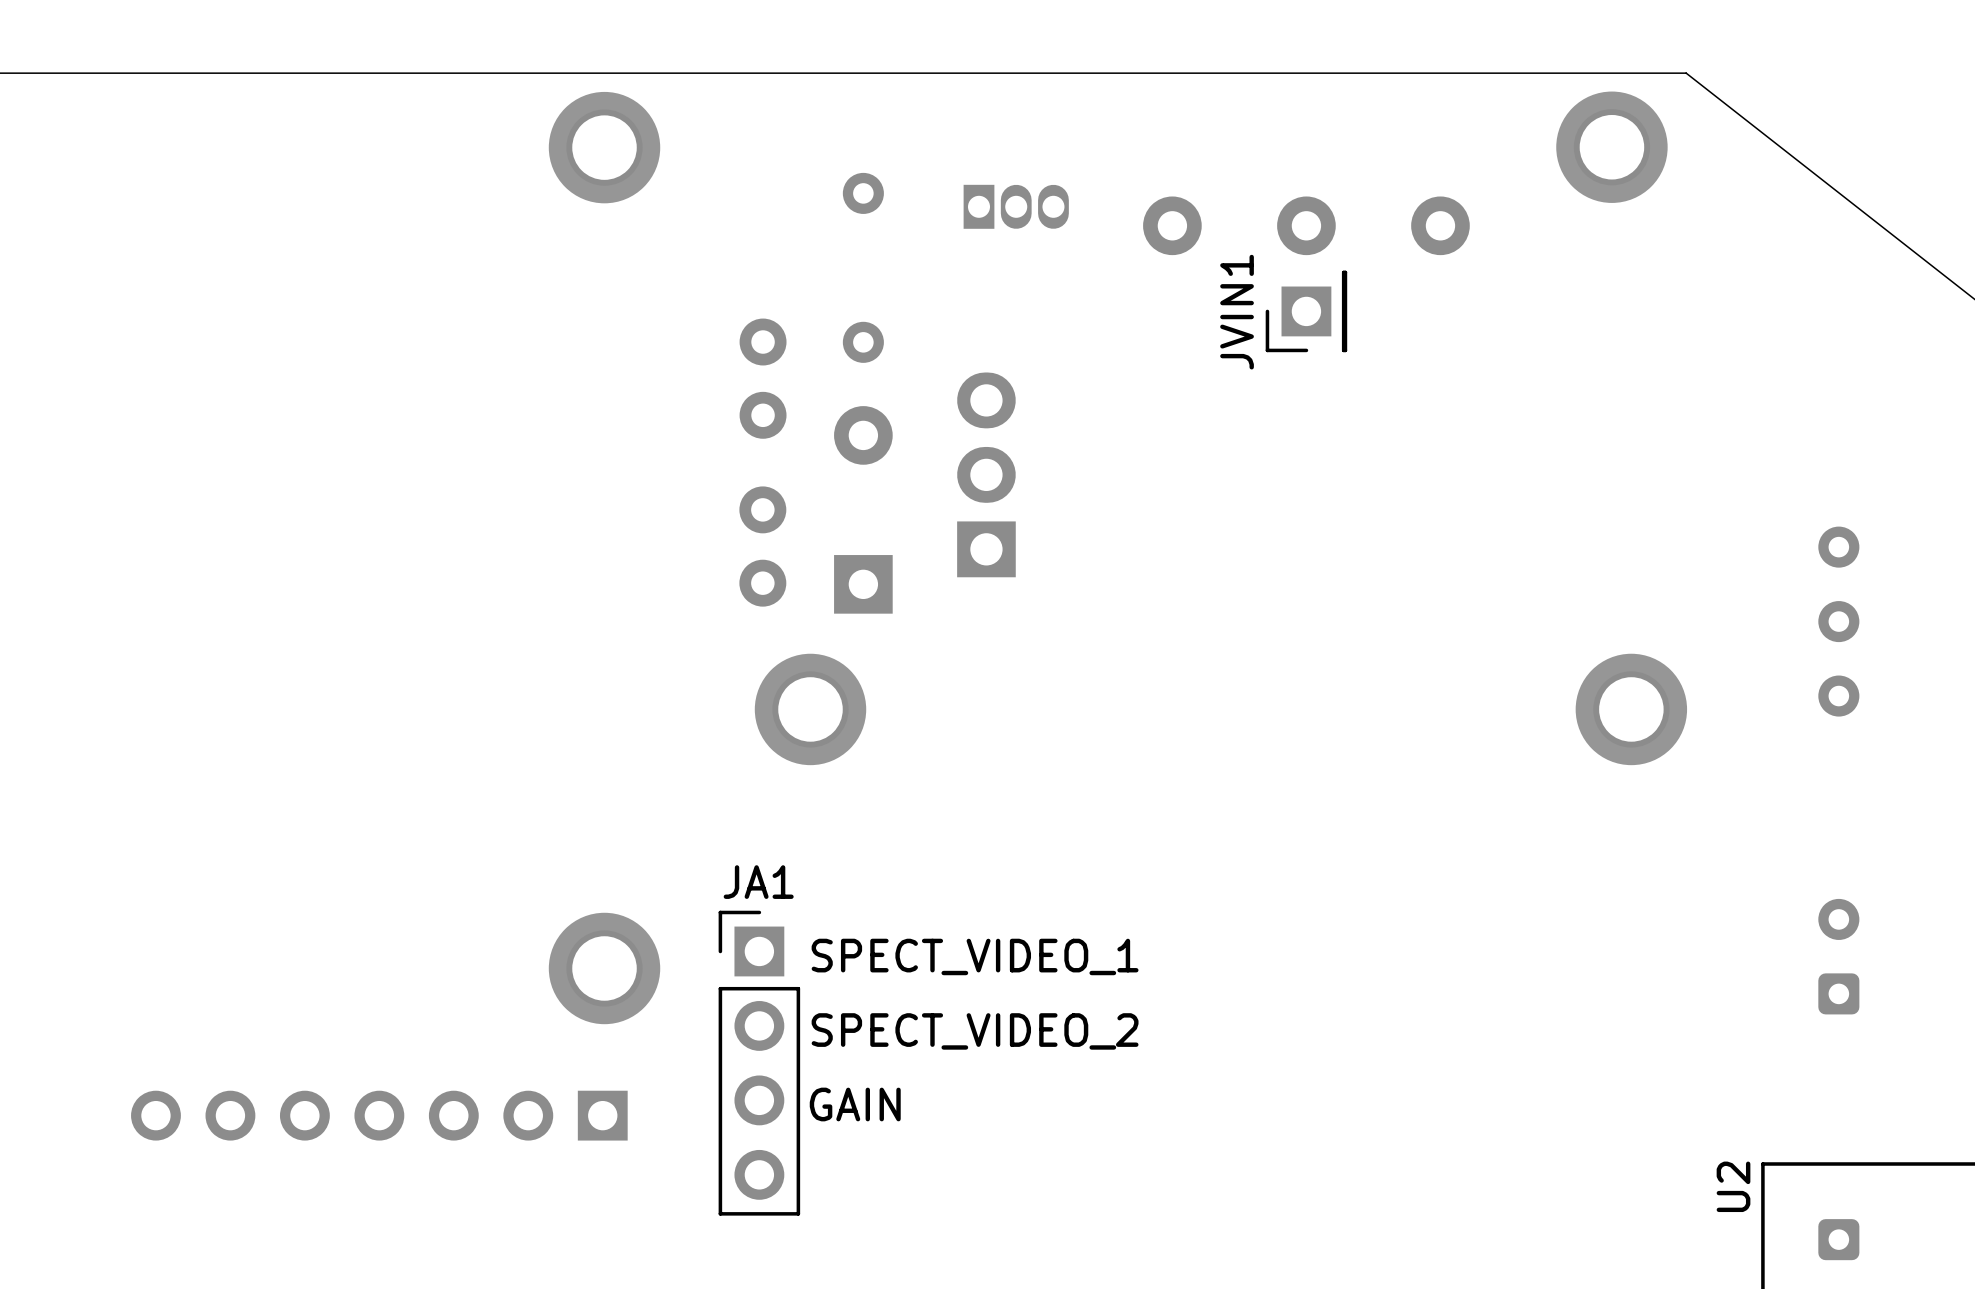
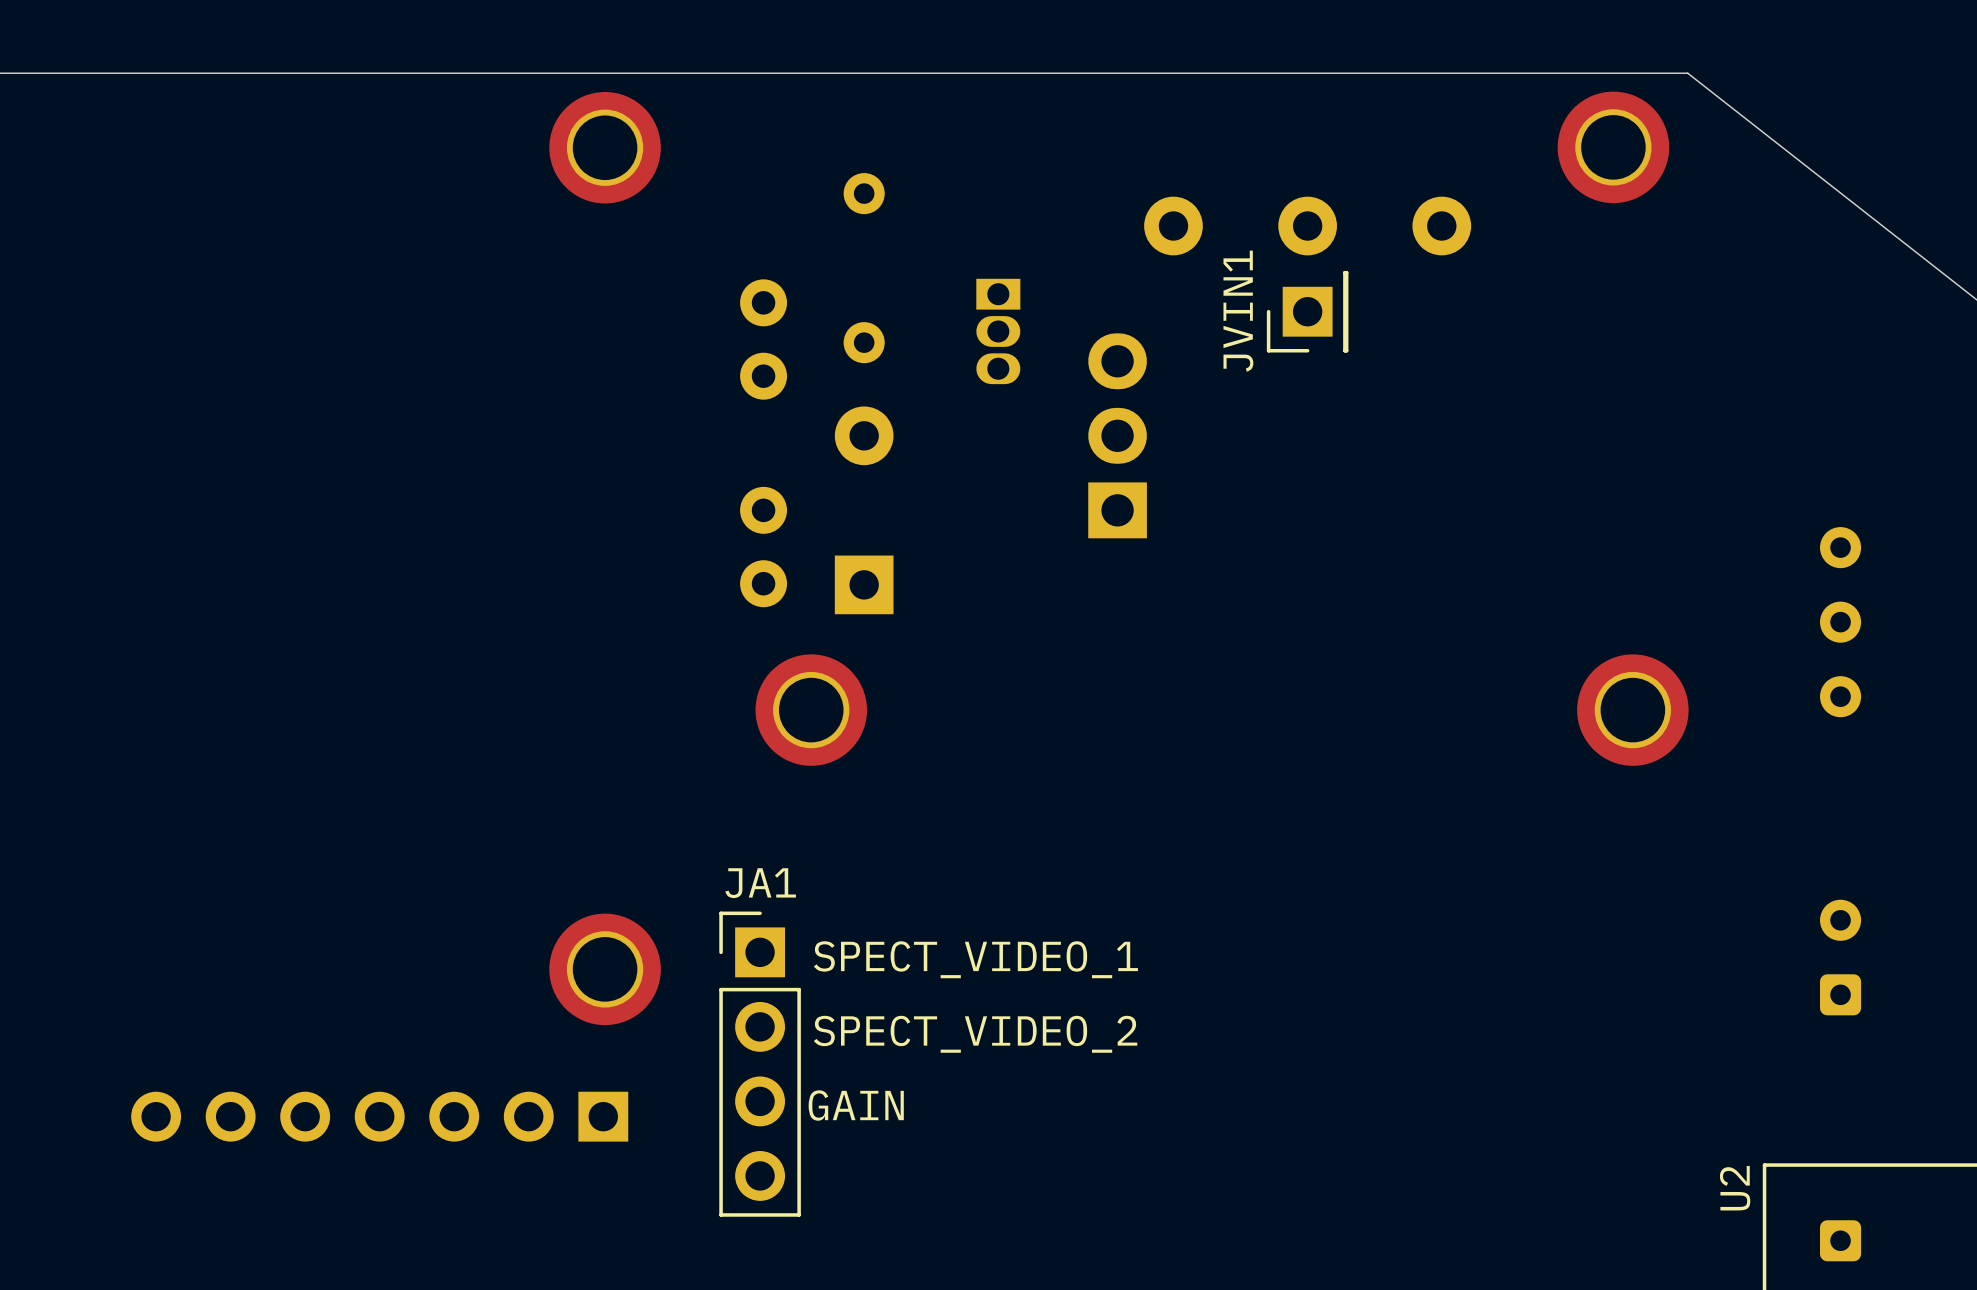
part rotation: 0° (1016, 206) -> 90° clockwise (998, 331)
part position: (1016, 206) -> (998, 331)
part position: (763, 378) -> (763, 339)
part position: (986, 474) -> (1117, 435)

